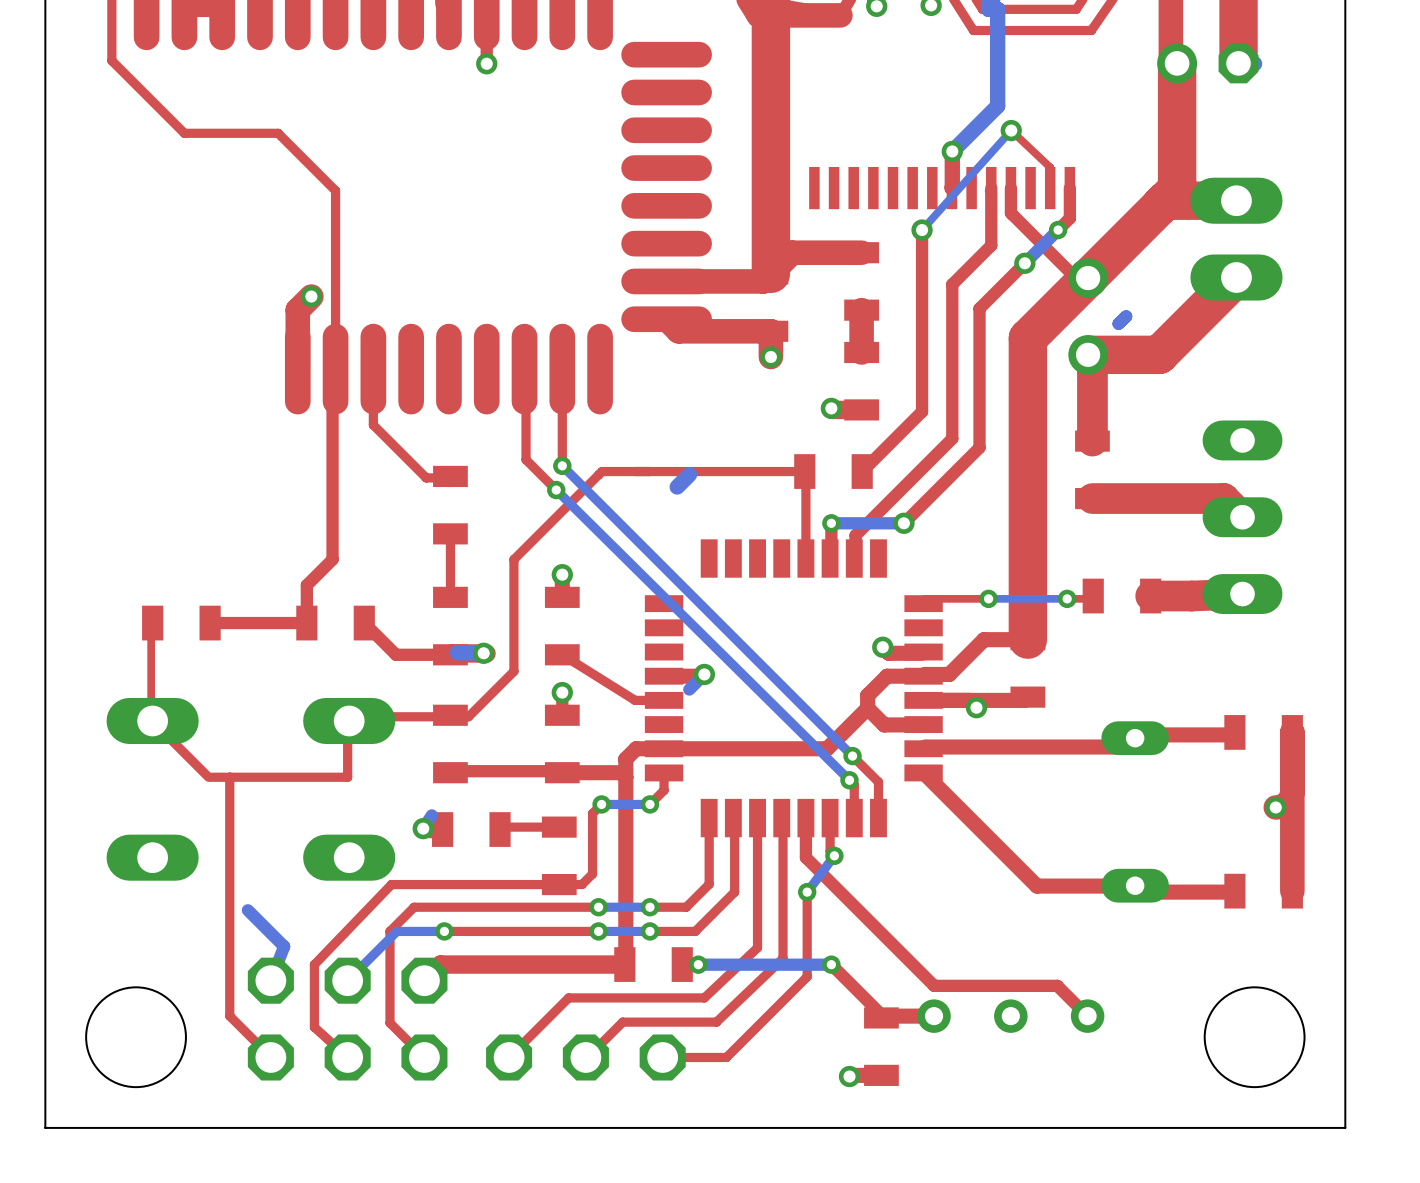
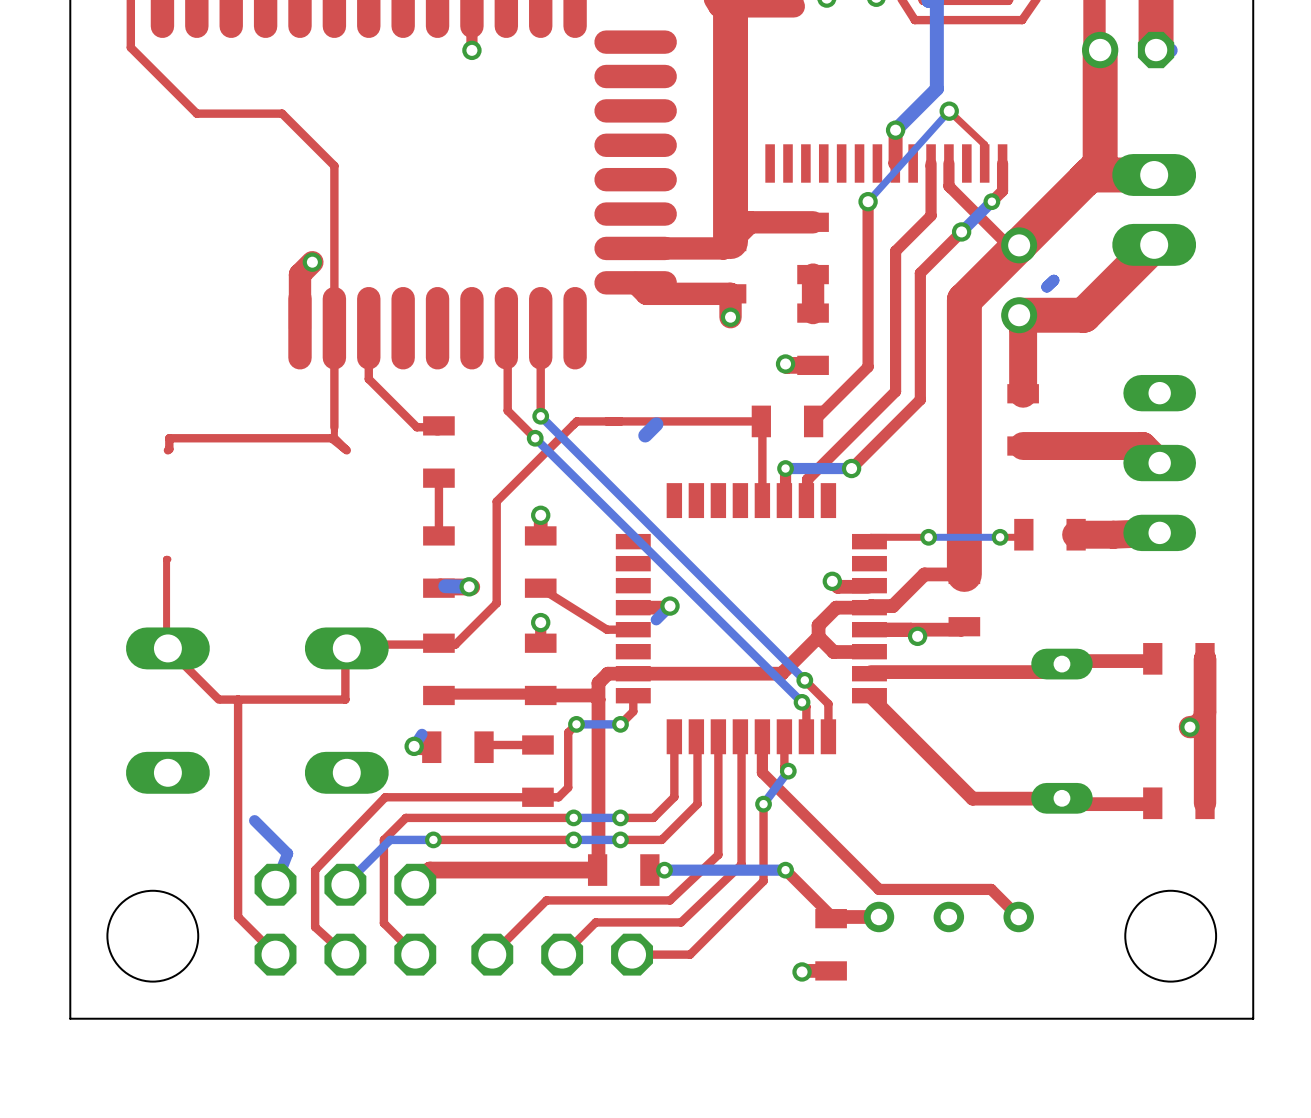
top track: (335, 369) (332, 369) (332, 559) (306, 585) (306, 623) (210, 623) -> (334, 328) (334, 438) (346, 450) (331, 438) (169, 438) (167, 450)
part: (181, 623) -> none
part: (335, 623) -> none
top track: (364, 623) (396, 654) (450, 654) -> none

